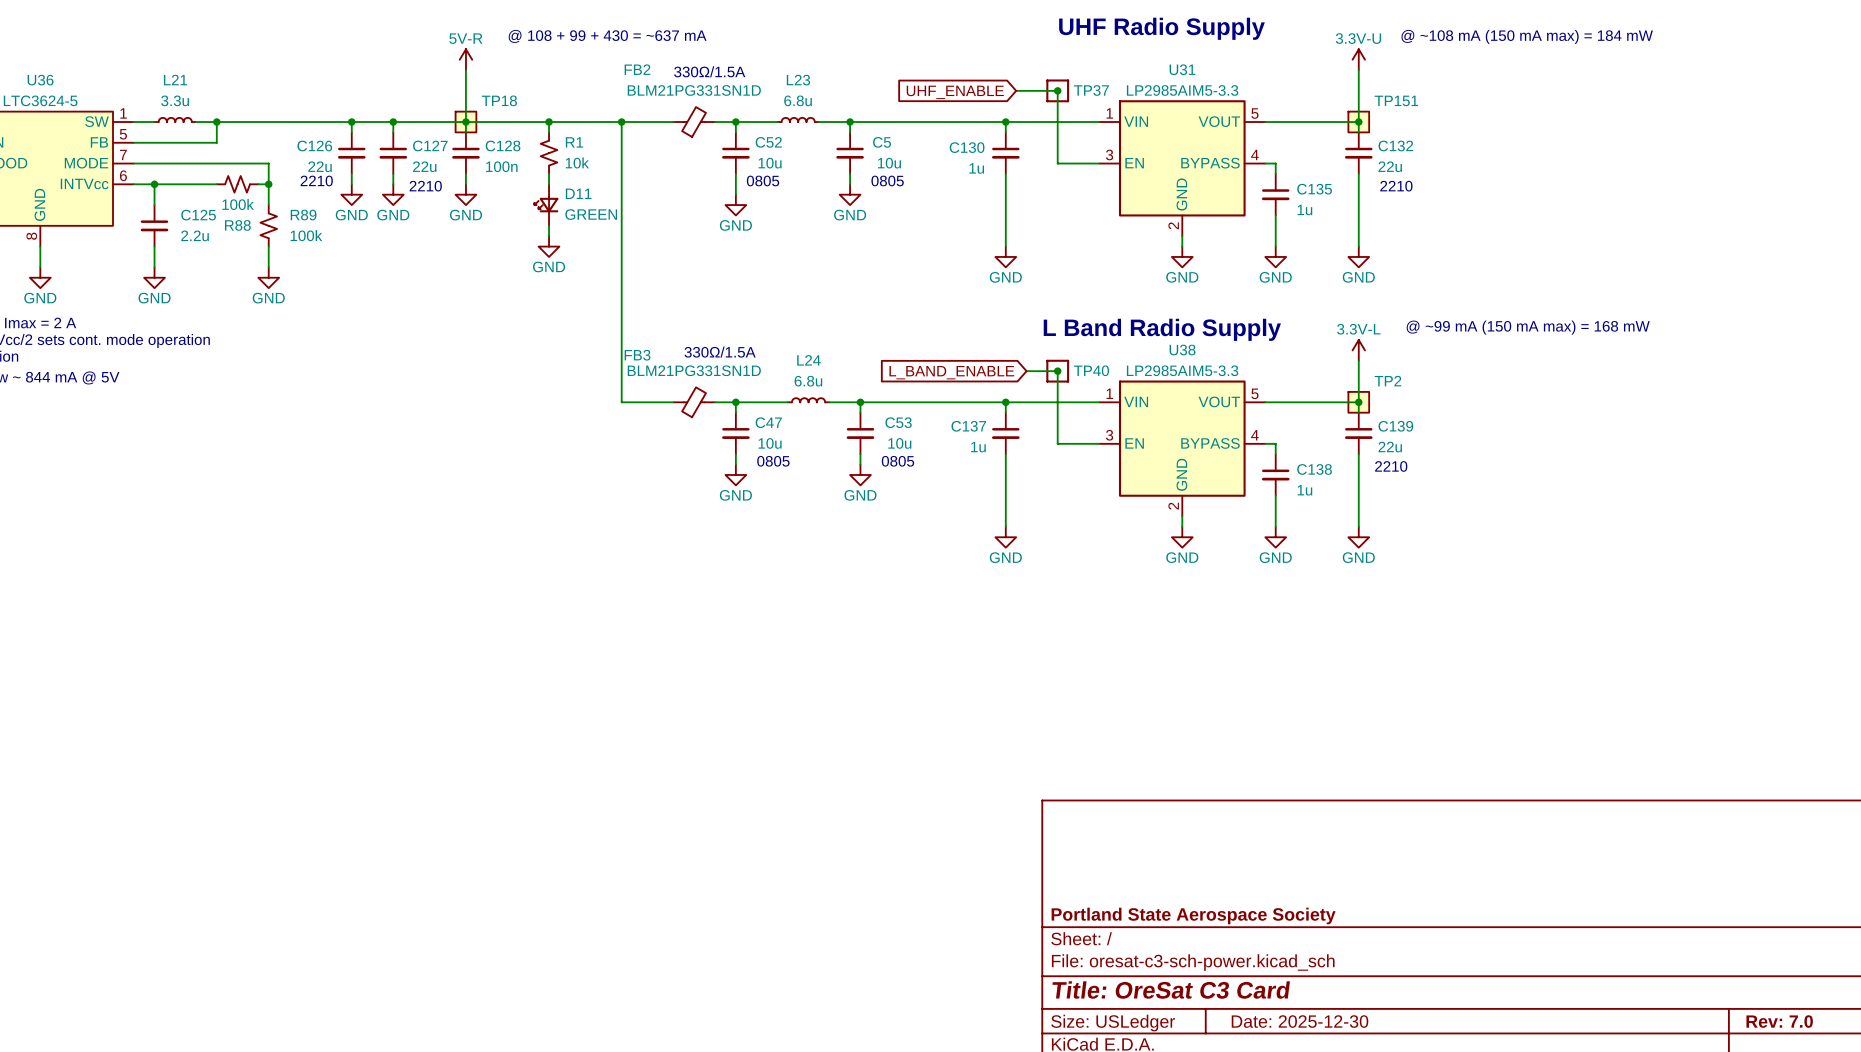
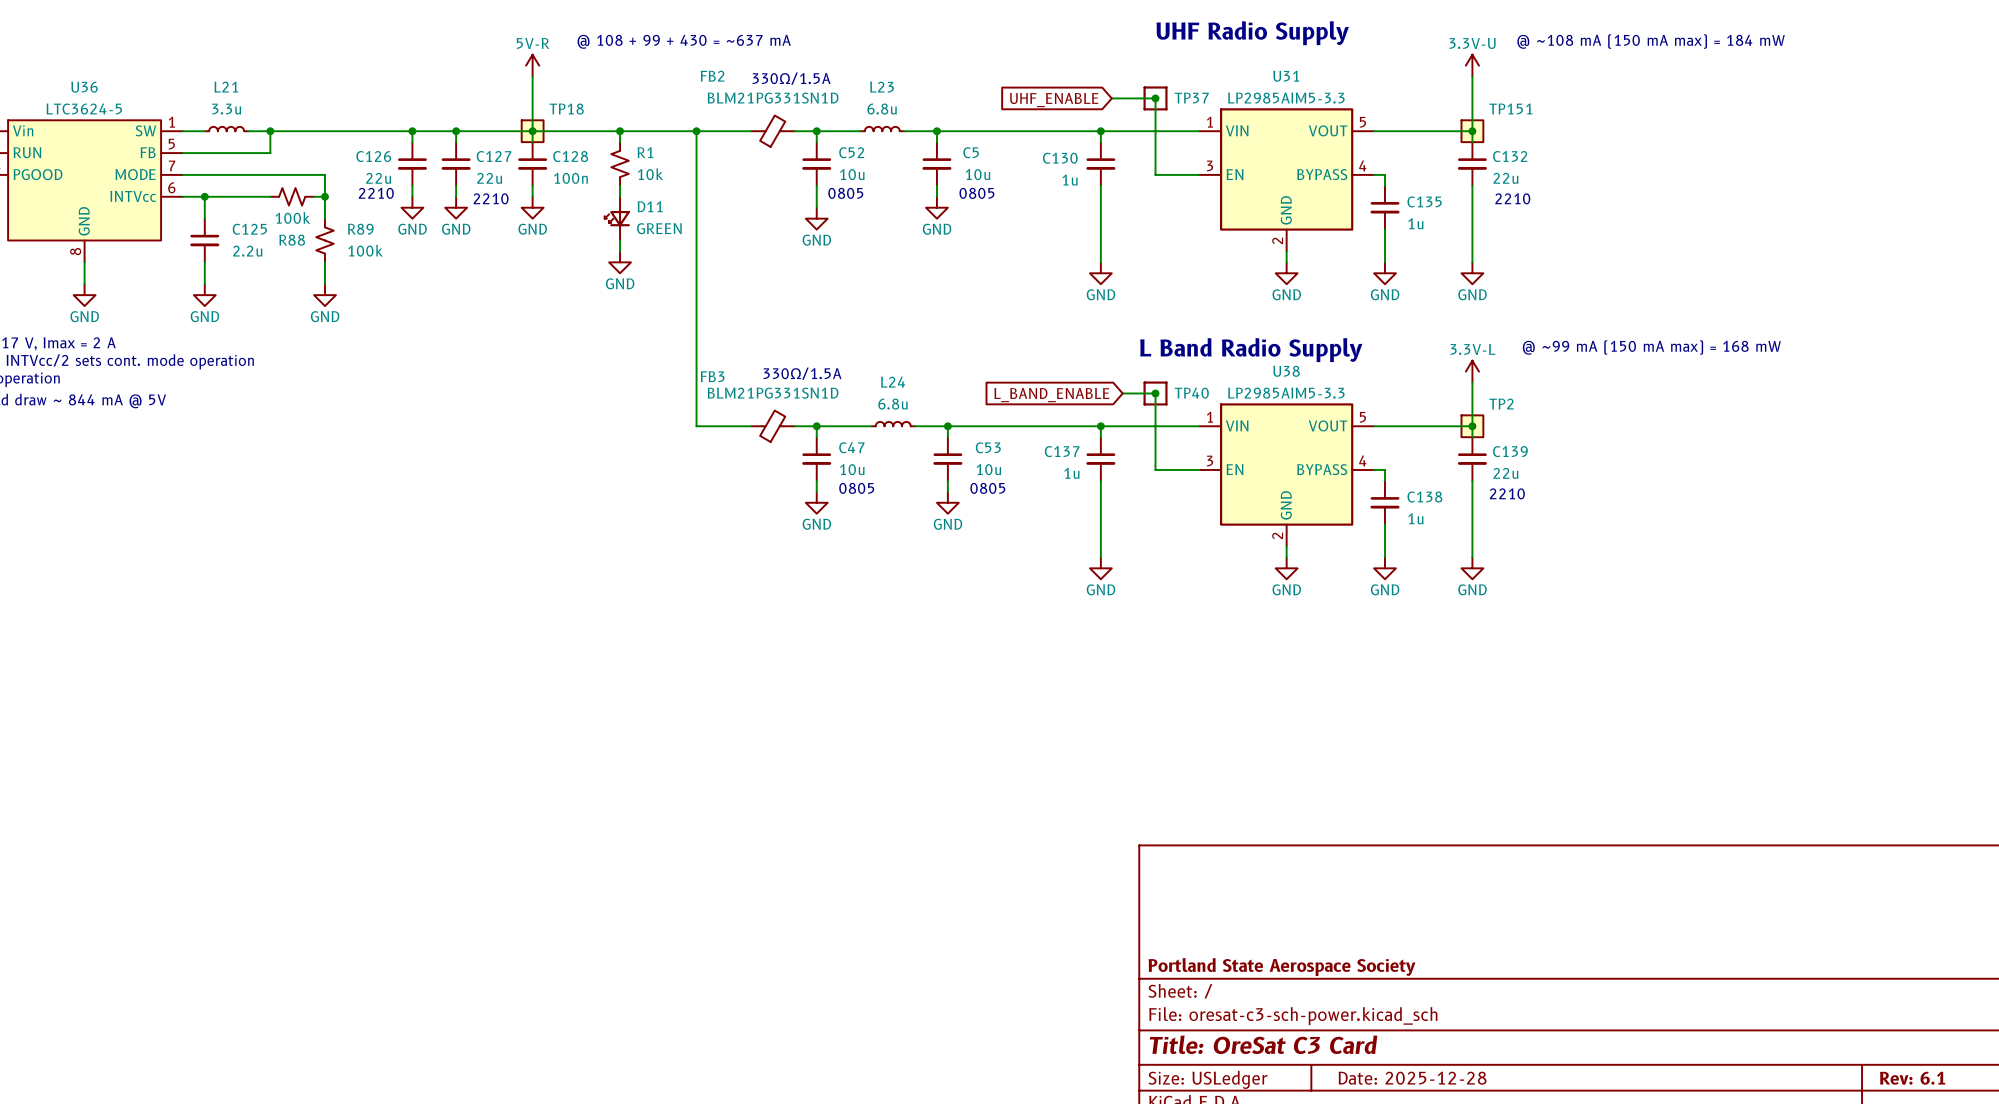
title block: Date: 2025-12-30 (1300, 1021) -> Date: 2025-12-28 (1412, 1078)
title block: Rev: 7.0 (1779, 1021) -> Rev: 6.1 (1912, 1078)

